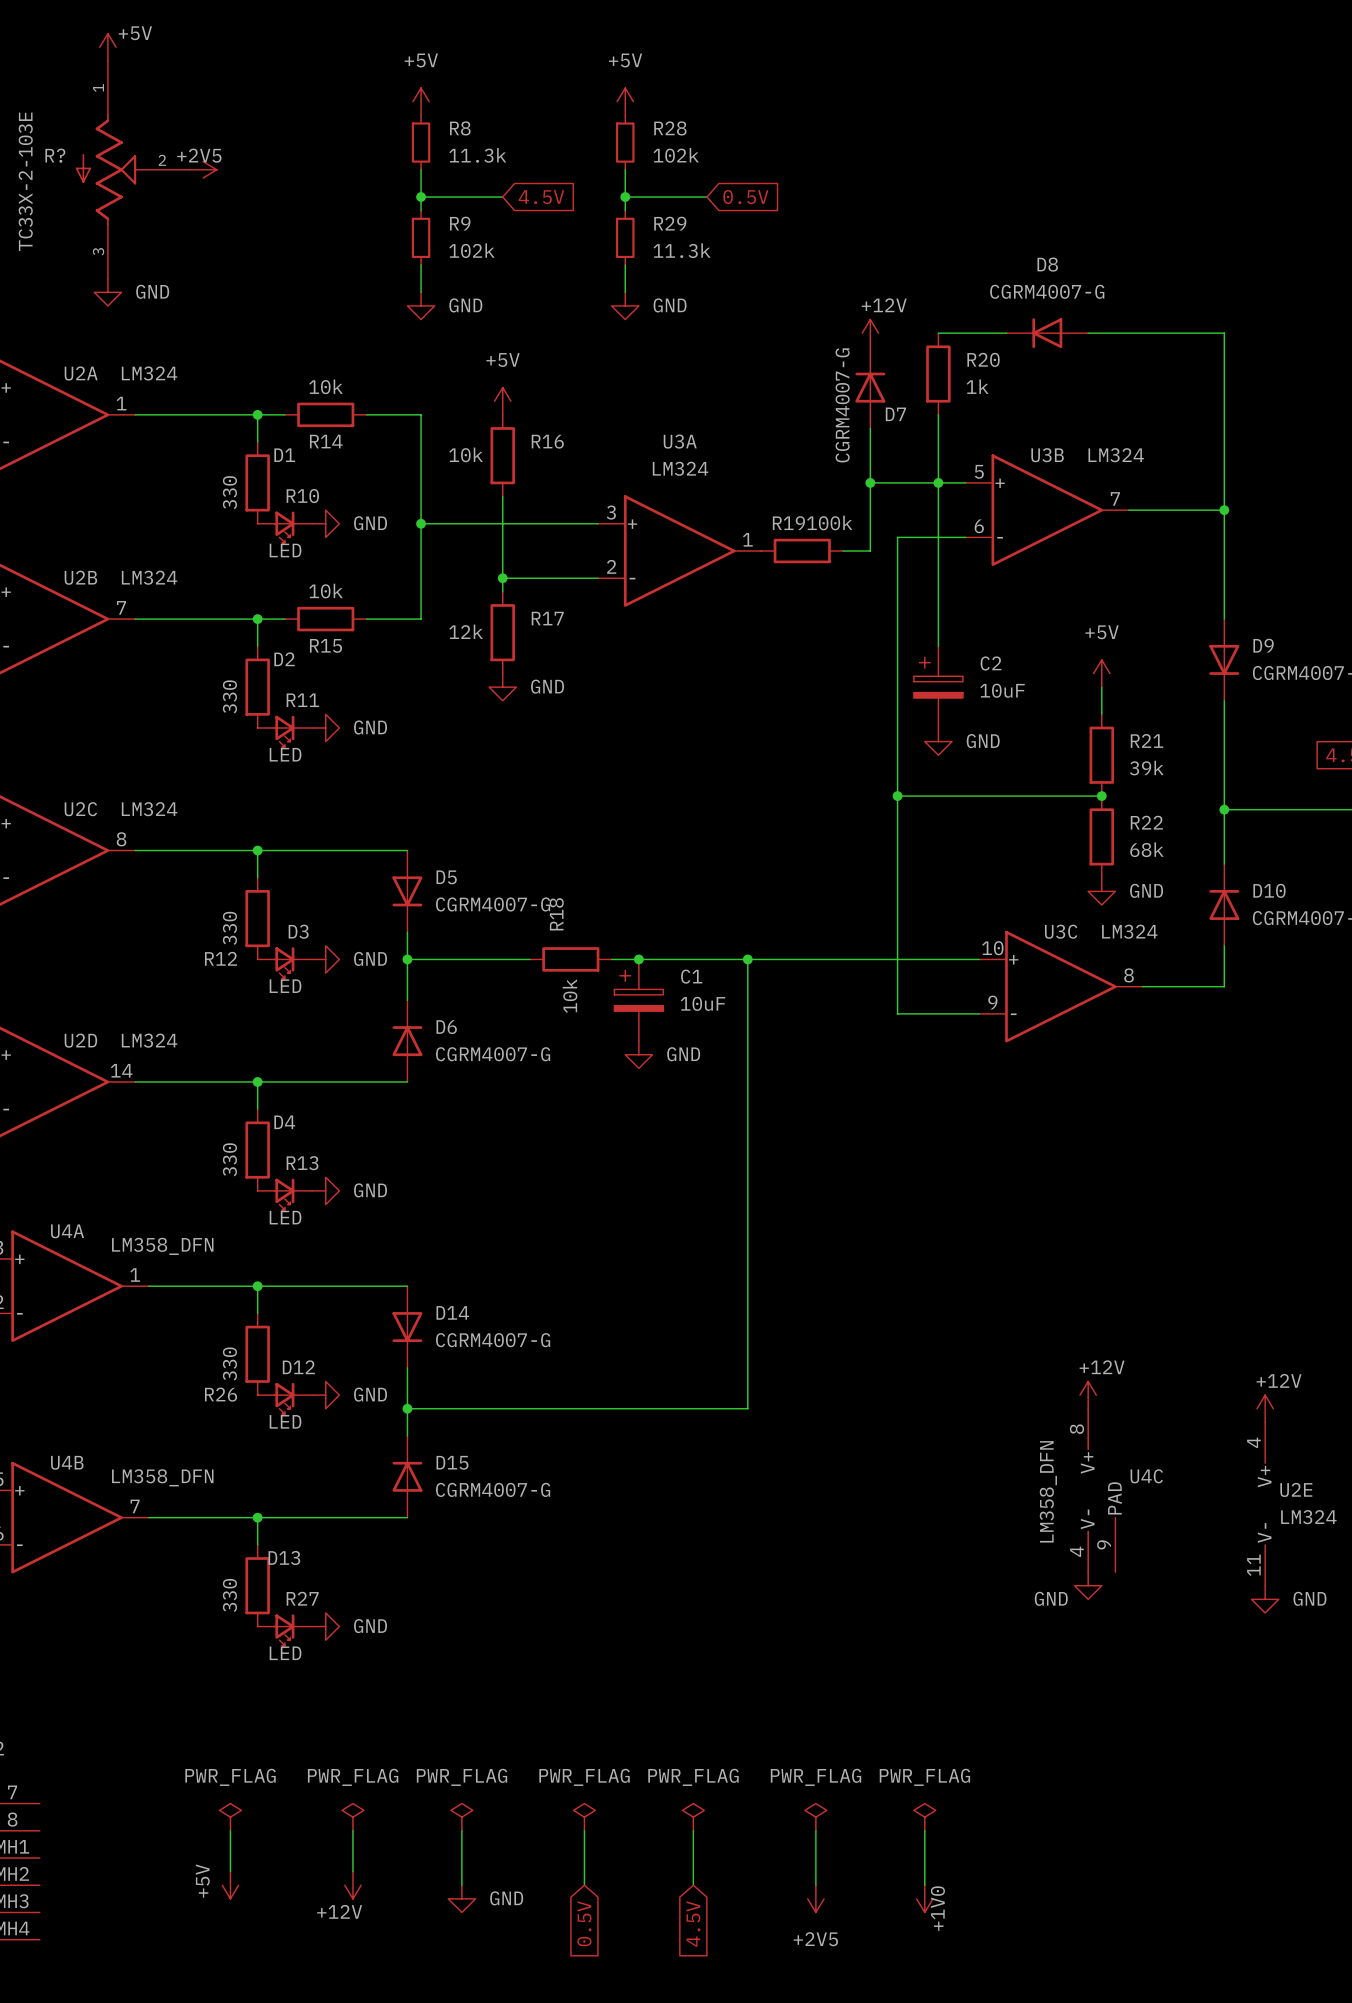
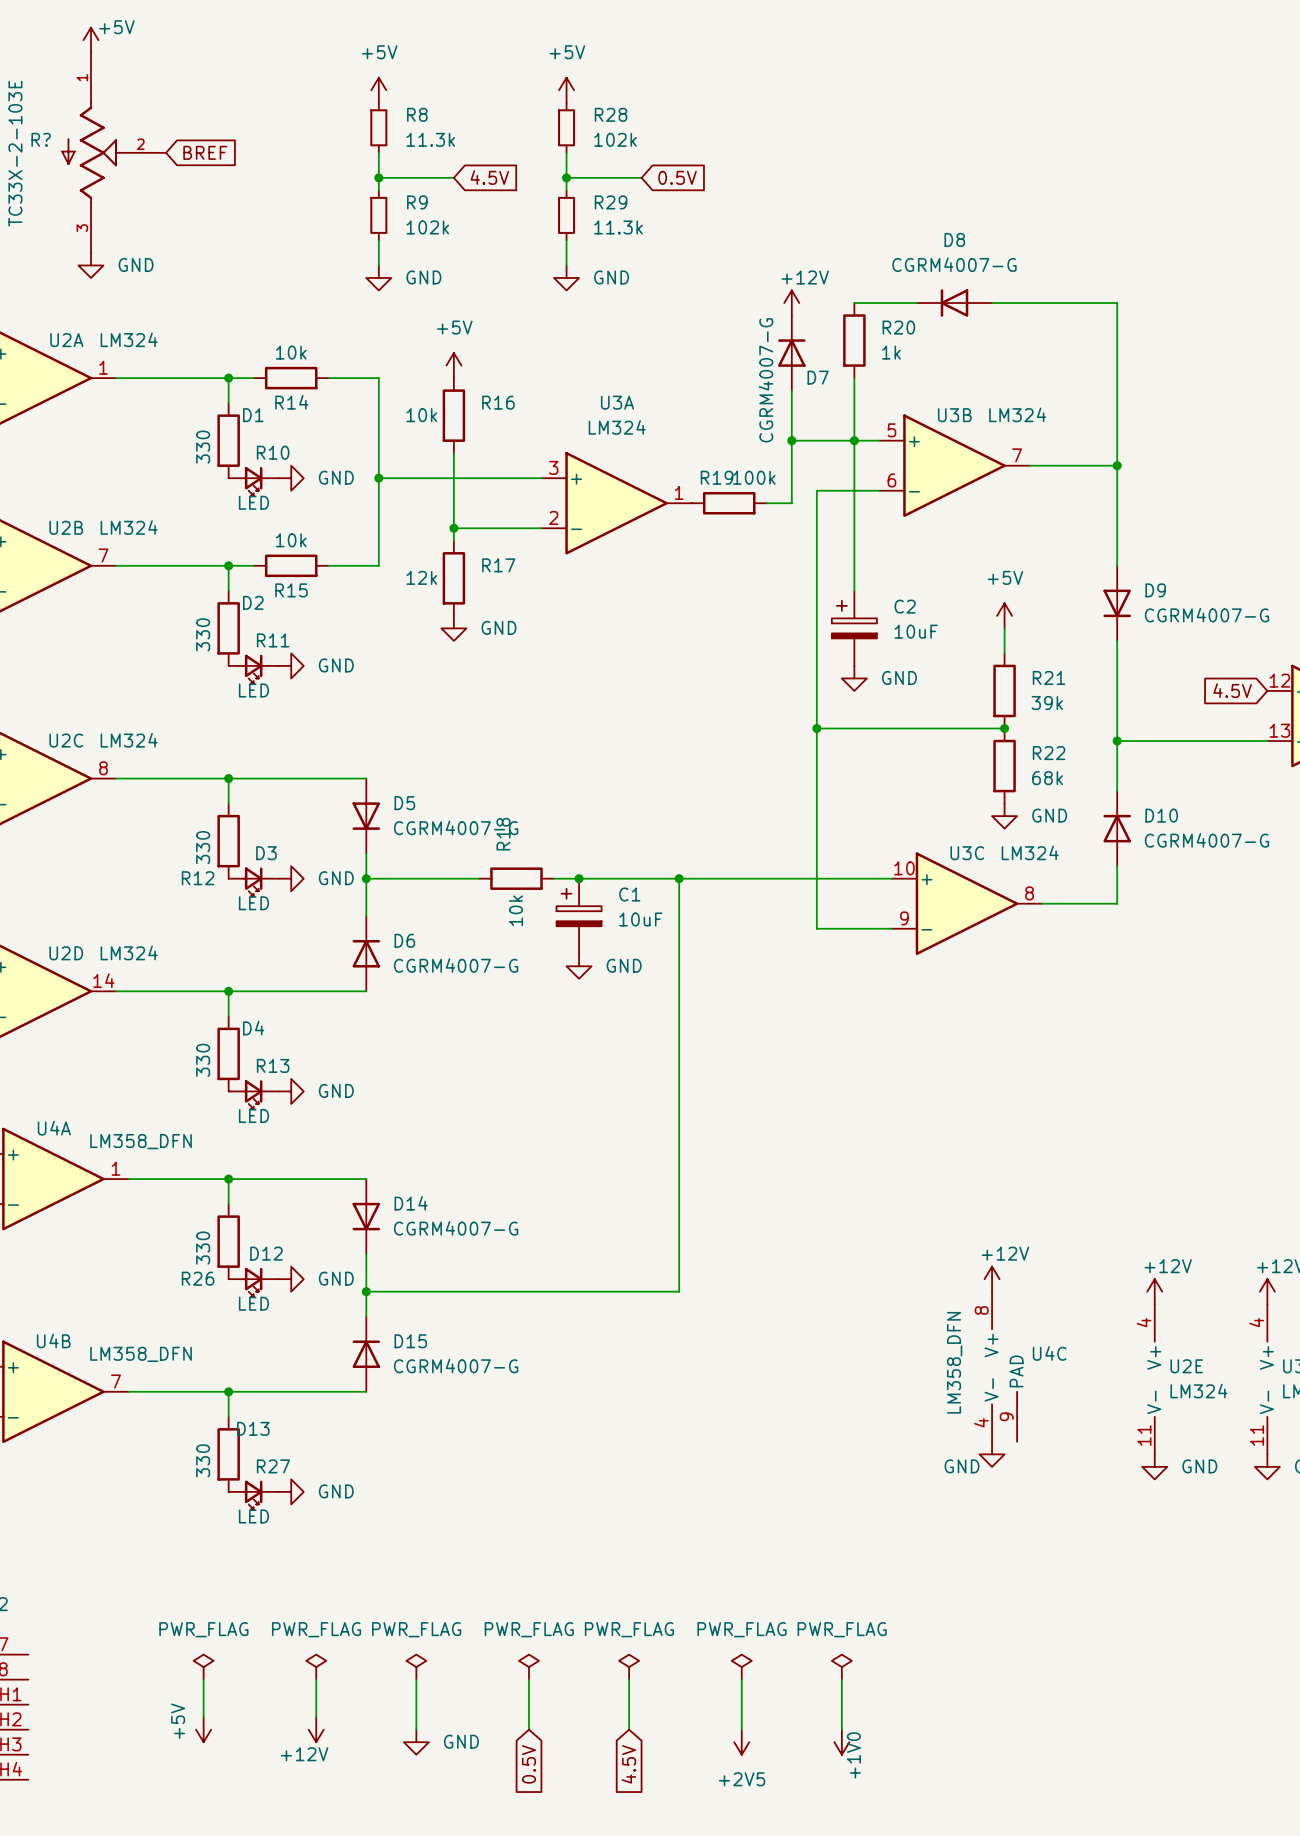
power symbol: +2V5 (203, 169) -> none
global label: none -> BREF (205, 152)

